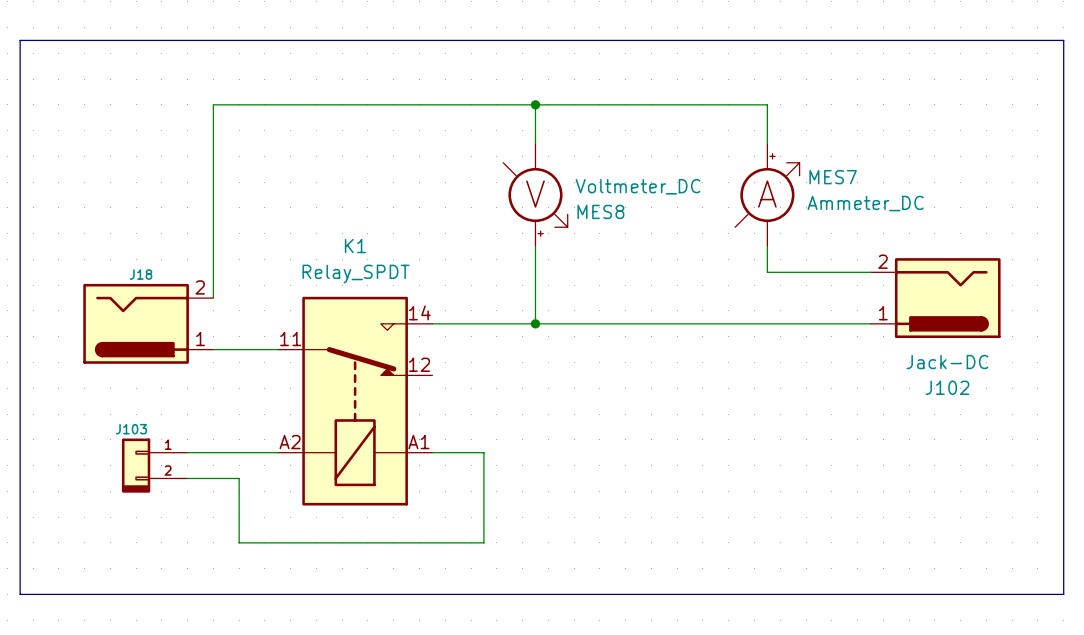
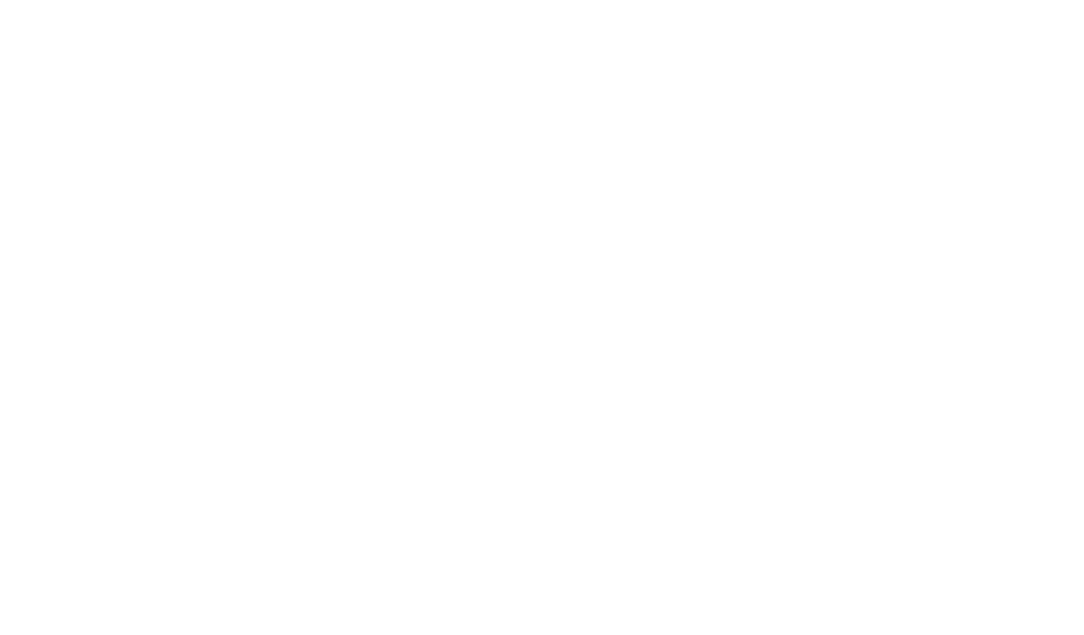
line: (20, 40) (1063, 40) (1063, 594) (20, 594) (20, 40) -> none
wire: (535, 104) (535, 143) -> none
junction: (535, 104) -> none
wire: (767, 143) (767, 104) (213, 104) (213, 298) -> none
MES8: Voltmeter_DC (535, 195) -> none
MES7: Ammeter_DC (767, 195) -> none
wire: (535, 246) (535, 323) -> none
wire: (767, 246) (767, 272) (870, 272) -> none
J102: Jack-DC (935, 298) -> none
J18: (148, 323) -> none
wire: (432, 323) (870, 323) -> none
junction: (535, 323) -> none
wire: (213, 349) (277, 349) -> none
K1: Relay_SPDT (355, 401) -> none
wire: (187, 452) (277, 452) -> none
wire: (432, 452) (483, 452) (483, 542) (239, 542) (239, 478) (187, 478) -> none
J103: (154, 465) -> none

